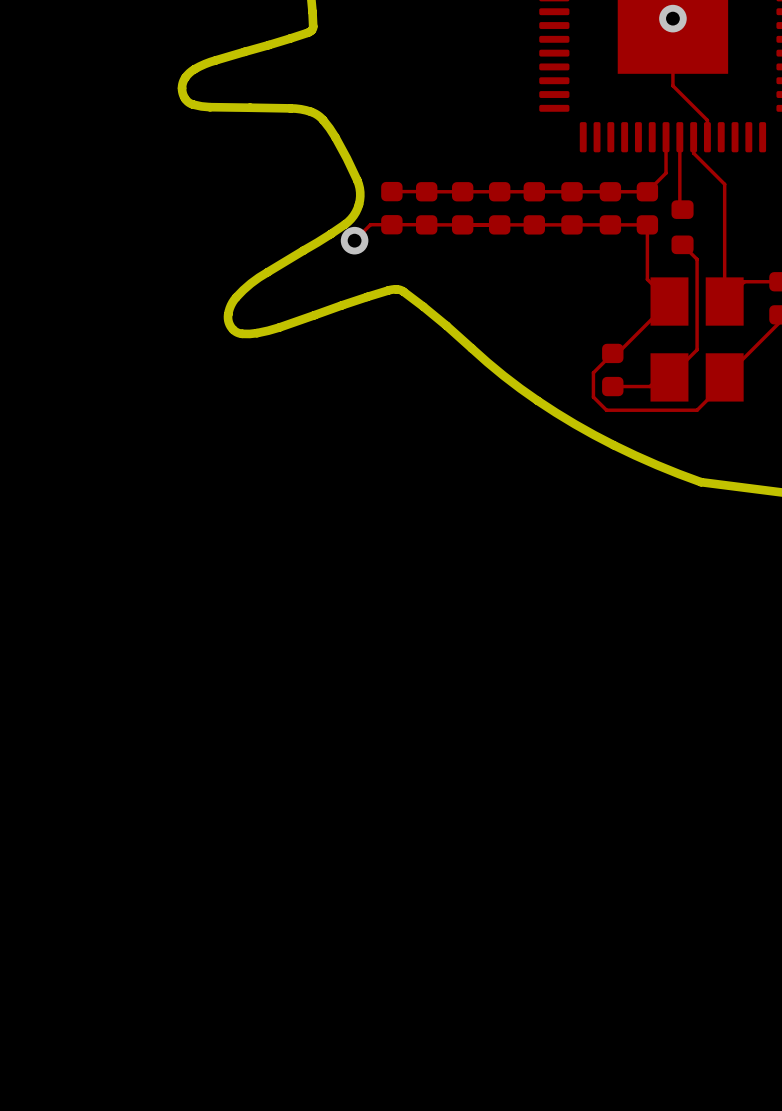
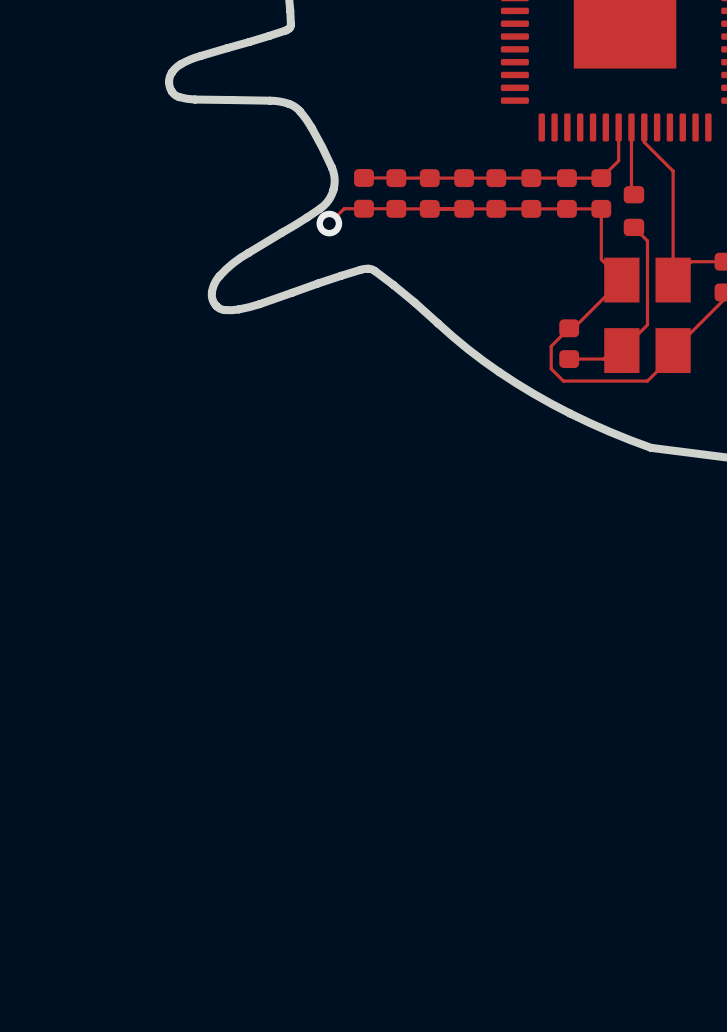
top track: (672, 18) (672, 85) (707, 120) (707, 137) -> none
via: (672, 18) -> none

